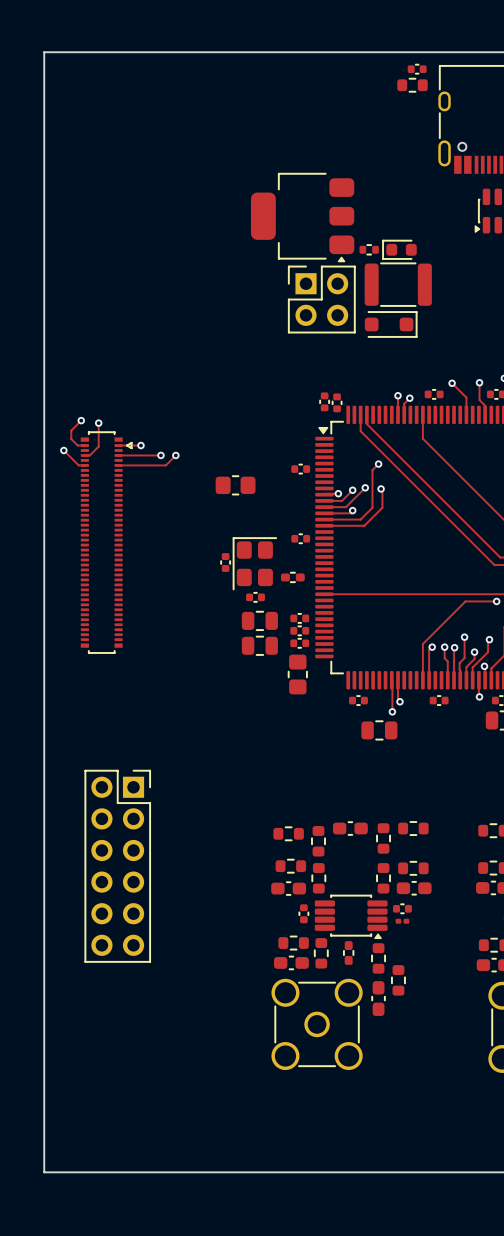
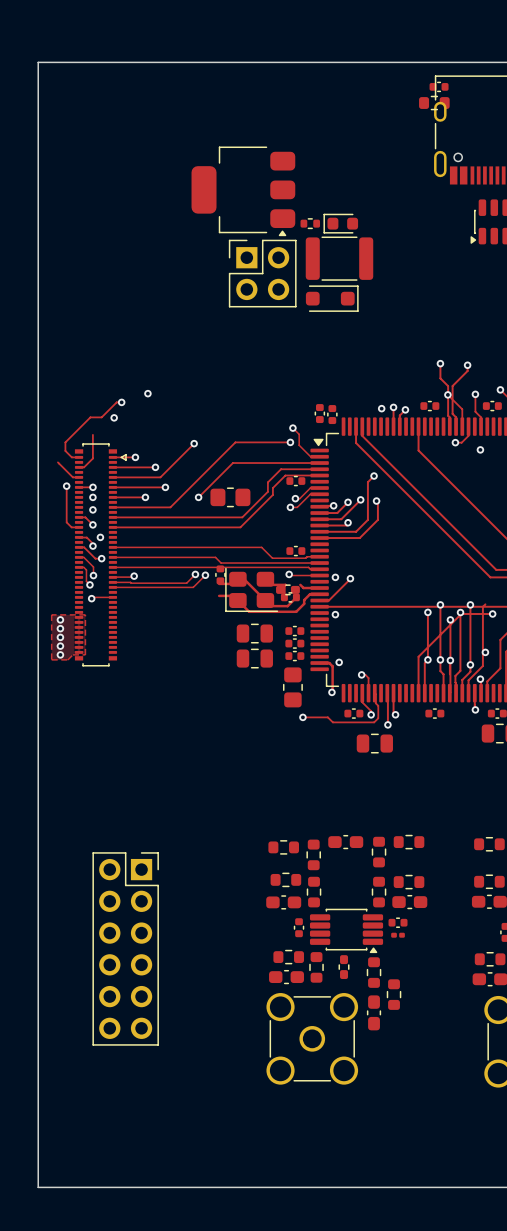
part position: (417, 69) -> (439, 86)
part position: (412, 85) -> (434, 103)
part position: (302, 217) -> (243, 191)
part position: (369, 249) -> (310, 223)
part position: (399, 249) -> (340, 223)
part position: (398, 284) -> (339, 258)
part position: (321, 299) -> (262, 273)
part position: (391, 324) -> (332, 298)
track: none -> (440, 363) (440, 378) (448, 386) (449, 426)
via: none -> (440, 363)
track: none -> (467, 365) (467, 371) (452, 386) (452, 413) (456, 417) (456, 426)
via: none -> (467, 365)
via: none -> (147, 393)
track: none -> (121, 402) (116, 402) (101, 417) (90, 417) (75, 432)
via: none -> (121, 402)
via: none -> (381, 408)
via: none -> (114, 417)
track: none -> (468, 426) (468, 435) (461, 442) (455, 442)
track: none -> (292, 428) (299, 434) (299, 445) (310, 456) (319, 456)
via: none -> (292, 428)
via: (81, 420) -> none
via: (98, 423) -> none
track: none -> (290, 442) (235, 442) (170, 507) (112, 507)
via: none -> (290, 442)
via: none -> (455, 442)
track: none -> (194, 443) (170, 467)
via: none -> (194, 443)
via: none -> (480, 449)
via: (63, 450) -> none
track: none -> (319, 463) (232, 463) (198, 497)
via: (175, 455) -> none
track: none -> (319, 469) (281, 469) (267, 482) (267, 491) (242, 517) (112, 517)
track: none -> (319, 475) (285, 475) (272, 488) (272, 494) (240, 527) (112, 527)
track: none -> (66, 486) (66, 522) (71, 527) (79, 527)
via: none -> (66, 486)
track: none -> (79, 487) (92, 487)
via: none -> (92, 487)
track: none -> (112, 487) (165, 487)
via: none -> (165, 487)
track: none -> (319, 488) (310, 488) (299, 498) (295, 498)
track: none -> (319, 494) (310, 494) (297, 507) (290, 507)
via: none -> (92, 497)
track: none -> (112, 497) (145, 497)
via: none -> (145, 497)
via: none -> (198, 497)
via: none -> (295, 498)
via: none -> (290, 507)
via: none -> (92, 509)
track: none -> (79, 517) (85, 517) (92, 524)
via: none -> (92, 524)
track: none -> (79, 537) (86, 537) (92, 546)
via: none -> (100, 537)
via: none -> (92, 546)
track: none -> (79, 547) (84, 547) (95, 558) (101, 558)
track: none -> (112, 547) (261, 547) (272, 558) (319, 556)
track: none -> (79, 557) (83, 557) (93, 567) (93, 575)
track: none -> (112, 557) (215, 557) (221, 563) (319, 563)
via: none -> (101, 558)
track: none -> (79, 567) (83, 567) (86, 569) (86, 581) (89, 584)
track: none -> (112, 567) (308, 567) (310, 569) (319, 569)
track: none -> (195, 574) (186, 583) (112, 582)
via: none -> (195, 574)
track: none -> (205, 575) (193, 587) (112, 587)
via: none -> (205, 575)
track: none -> (289, 574) (319, 575)
via: none -> (289, 574)
via: none -> (93, 575)
track: none -> (134, 576) (112, 577)
via: none -> (134, 576)
part rotation: 0° (254, 563) -> 90° counterclockwise (251, 589)
via: none -> (335, 577)
track: none -> (265, 579) (271, 584) (285, 584) (284, 597)
track: none -> (350, 578) (328, 600) (319, 600)
via: none -> (350, 578)
track: none -> (219, 583) (233, 583) (237, 579) (244, 579) (271, 606) (287, 606) (296, 597)
via: none -> (89, 584)
track: none -> (300, 584) (303, 588) (319, 588)
track: none -> (319, 594) (310, 594) (296, 611) (249, 611) (233, 595) (219, 595)
track: none -> (112, 597) (91, 598)
via: none -> (91, 598)
track: none -> (440, 604) (440, 659)
via: none -> (440, 604)
track: none -> (470, 604) (470, 664)
via: none -> (470, 604)
part position: (255, 597) -> (290, 597)
track: none -> (427, 612) (427, 659)
via: none -> (427, 612)
via: none -> (460, 612)
track: none -> (460, 612) (460, 649)
zone outline: none -> (51, 614) (51, 659) (67, 659) (72, 654) (85, 654) (85, 614) (51, 614)
via: none -> (335, 614)
via: none -> (60, 619)
via: none -> (450, 619)
via: none -> (60, 628)
via: none -> (60, 637)
via: none -> (60, 646)
via: (464, 637) -> none
track: (489, 639) (486, 653) -> (485, 604) (482, 606) (482, 665)
via: none -> (60, 654)
via: none -> (339, 662)
track: none -> (319, 663) (329, 663) (332, 666) (331, 692)
track: (454, 661) (454, 680) -> (450, 619) (449, 693)
track: none -> (361, 674) (365, 674) (368, 678) (368, 693)
via: none -> (361, 674)
via: none -> (331, 692)
track: none -> (362, 693) (362, 702) (371, 711) (371, 714)
track: none -> (374, 693) (375, 703) (378, 705) (378, 718) (374, 722) (332, 722) (327, 717) (302, 717)
via: none -> (371, 714)
via: none -> (302, 717)
part position: (117, 866) -> (125, 948)

